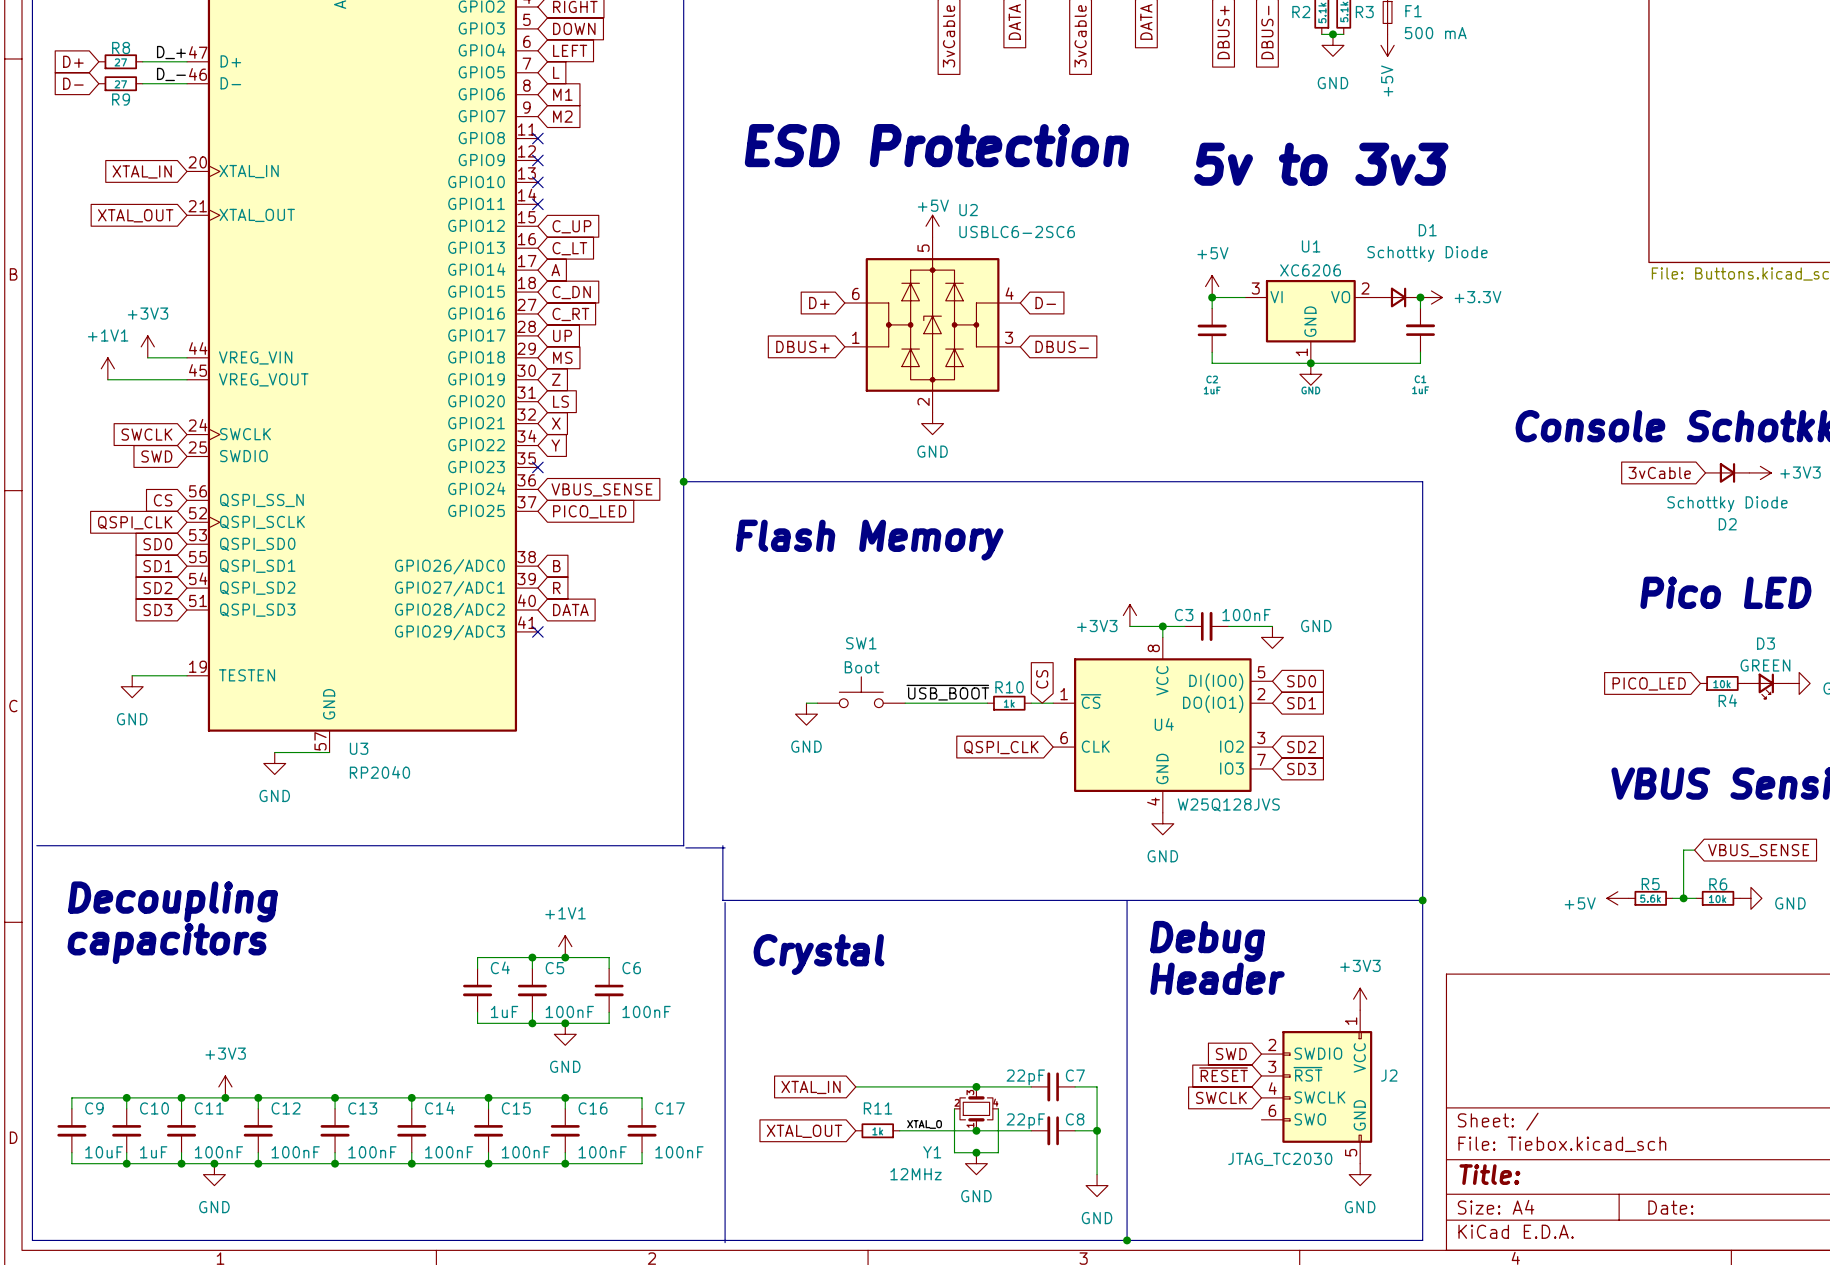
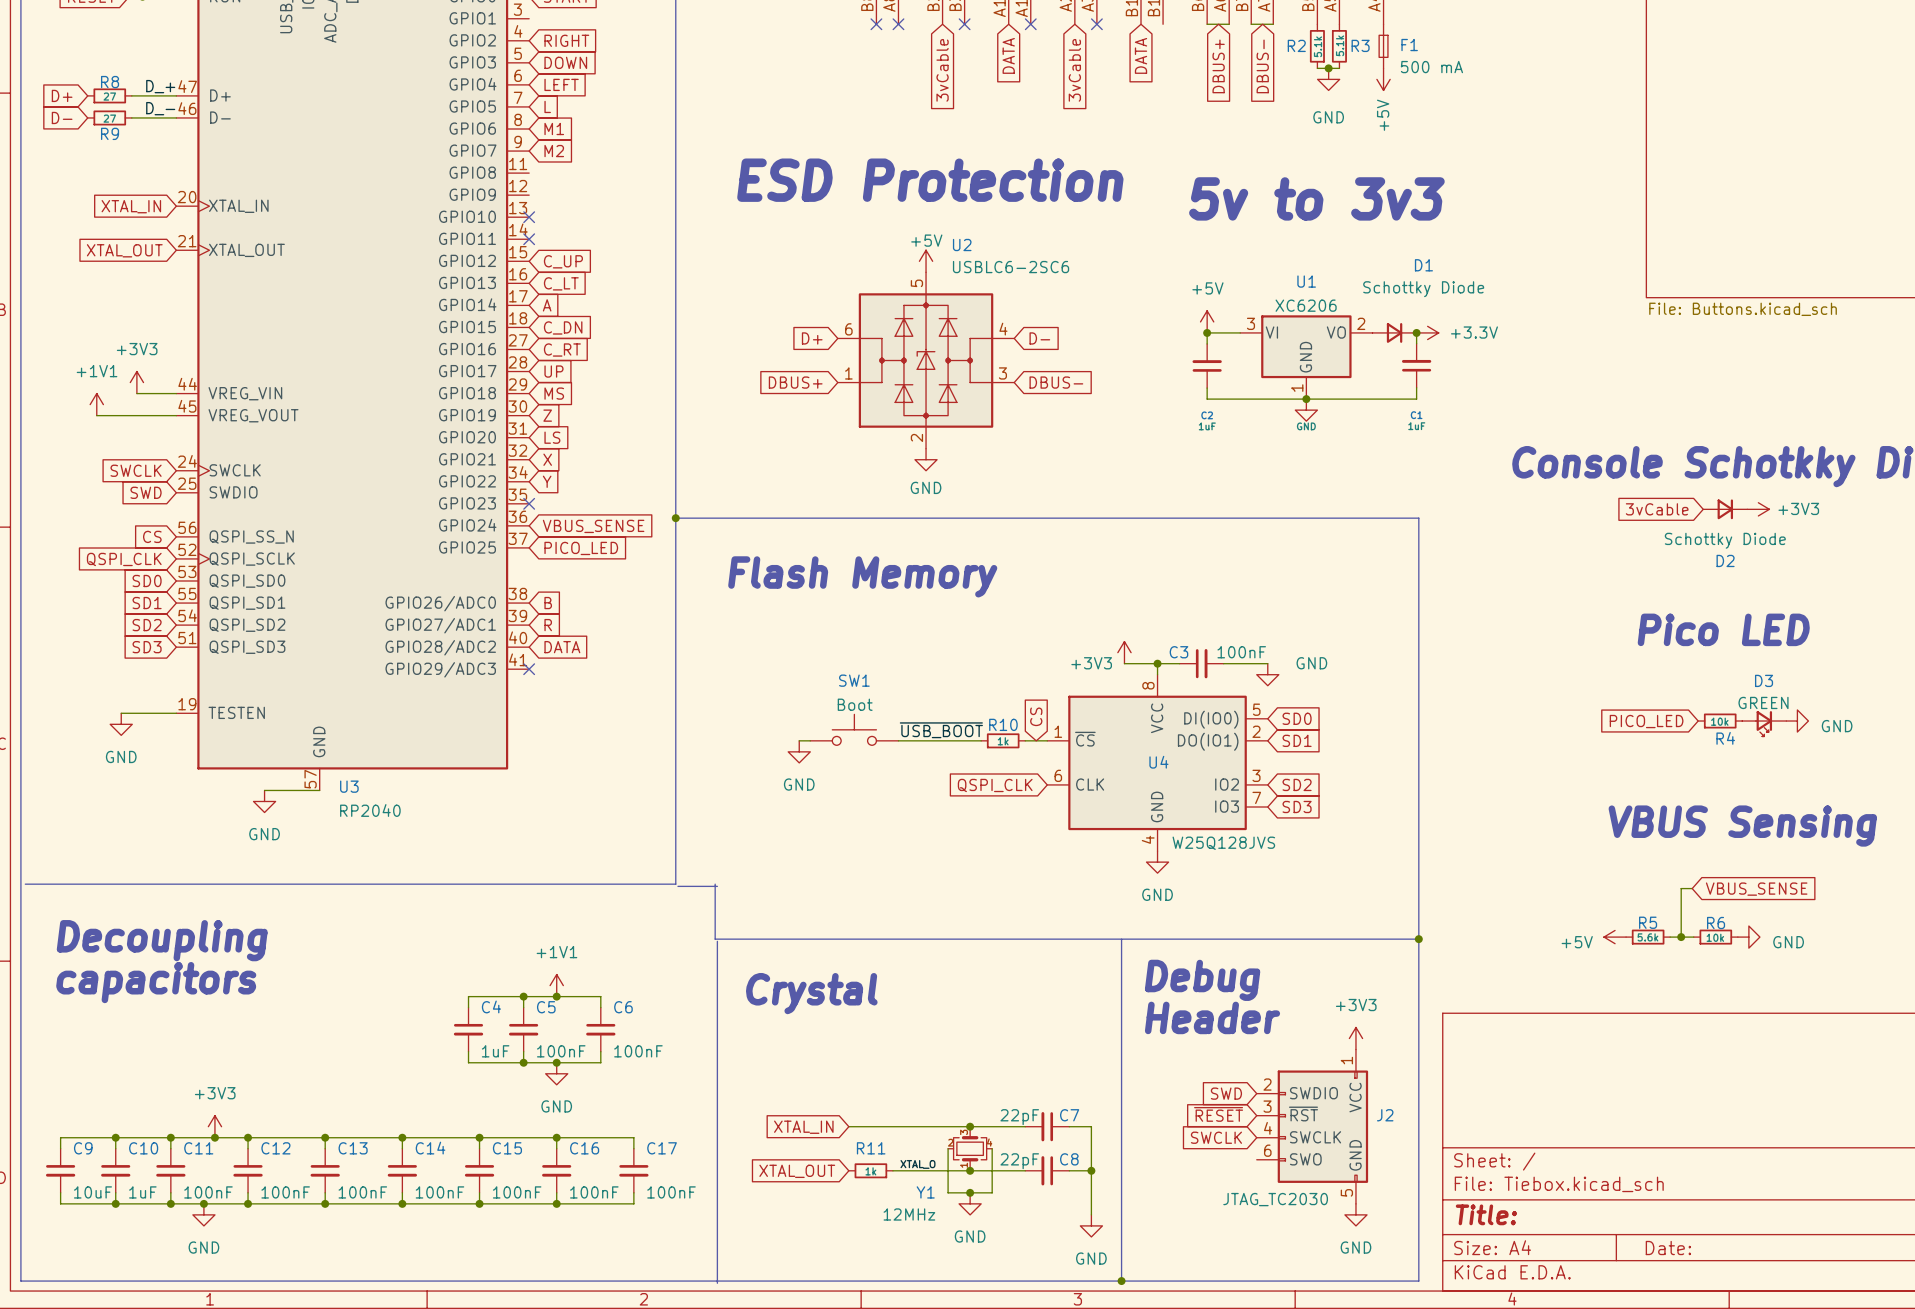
no-connect mark: (537, 138) -> none
no-connect mark: (537, 160) -> none

